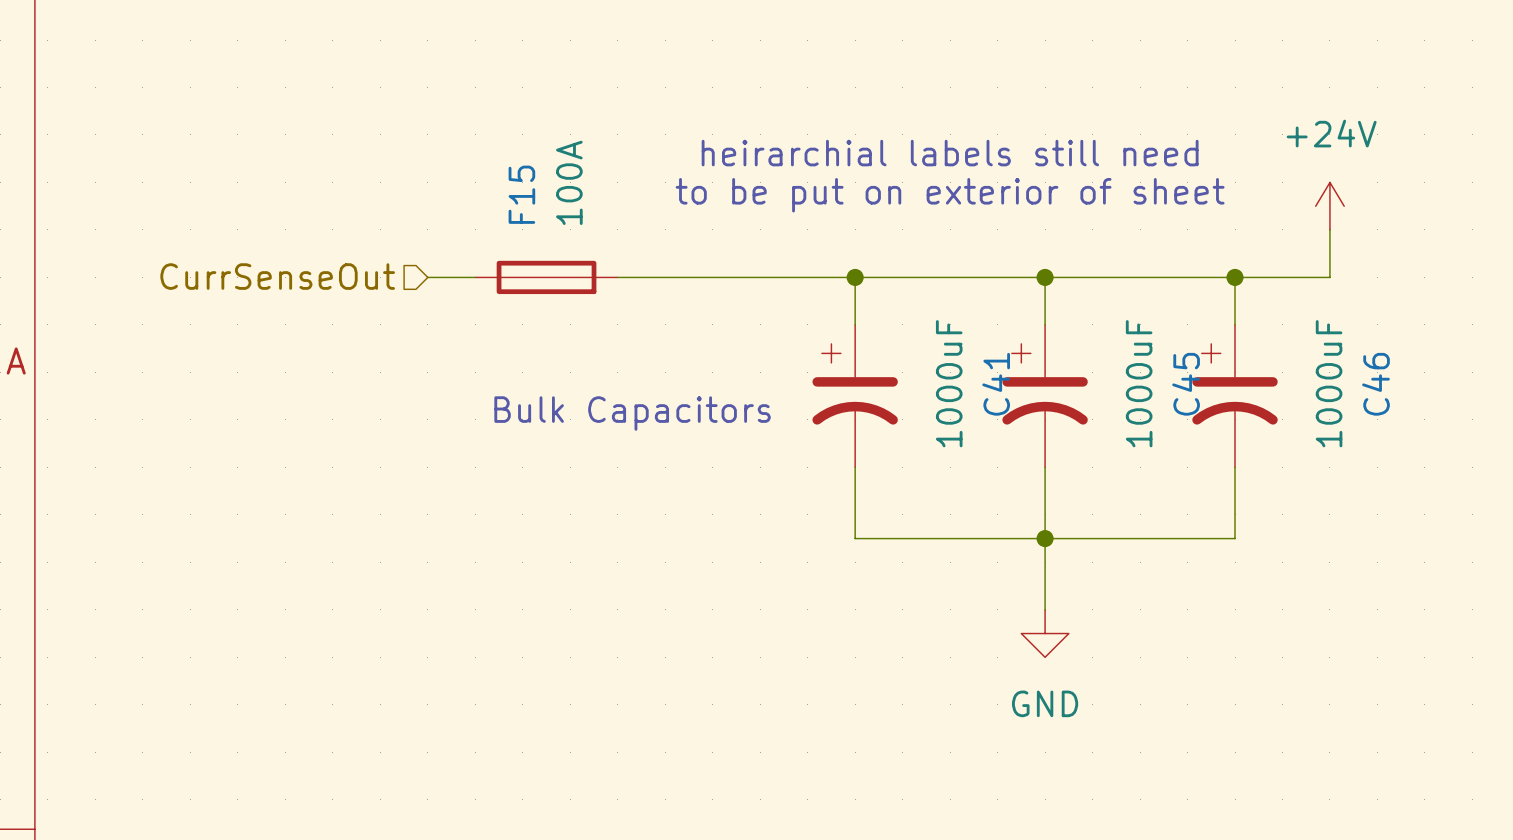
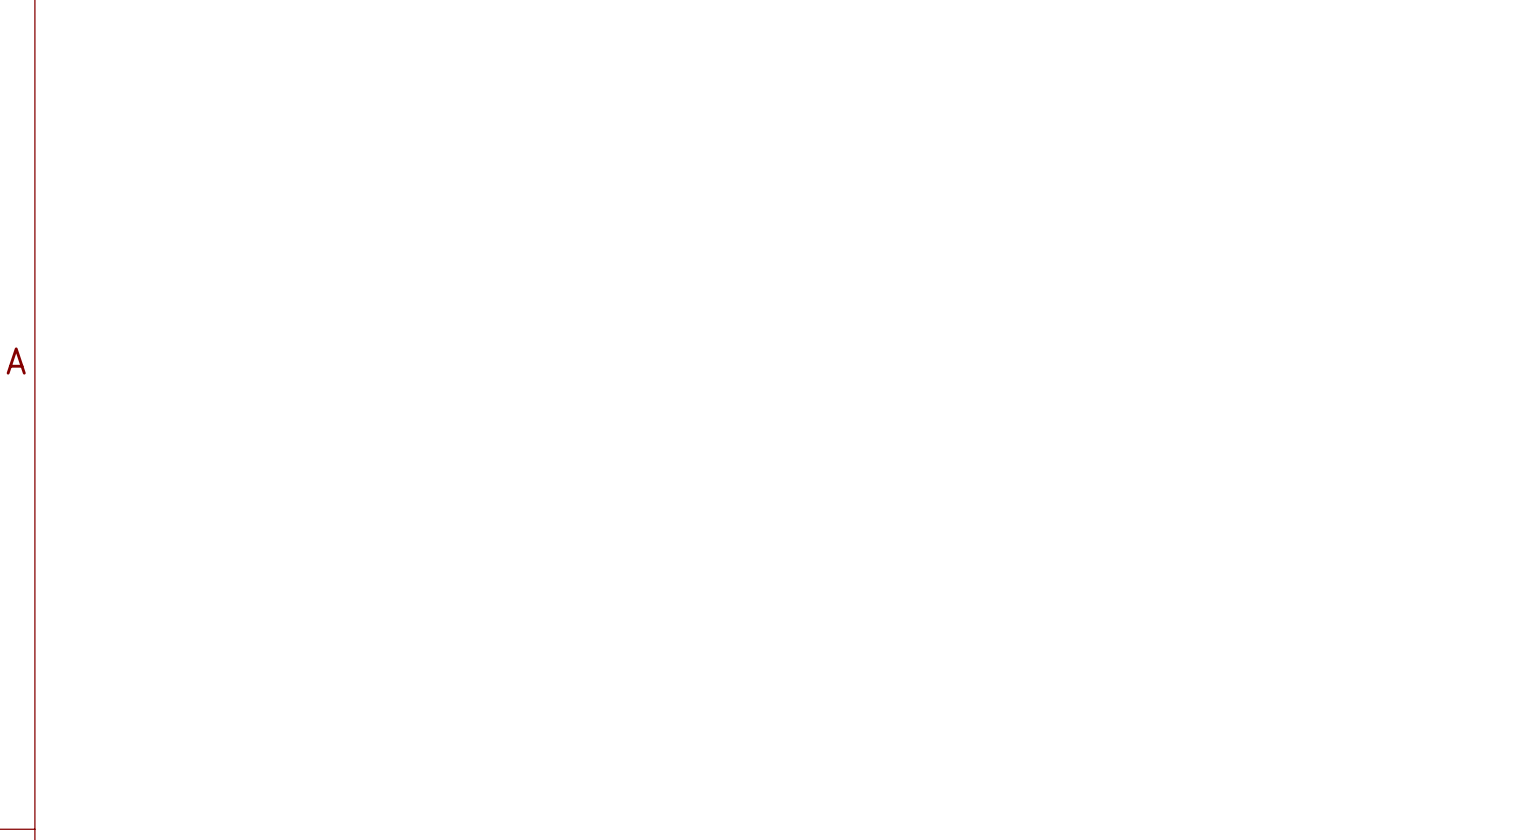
text: heirarchial labels still need (950, 153) -> none
text: to be put on exterior of sheet (950, 195) -> none
power symbol: +24V (1329, 206) -> none
wire: (1329, 229) (1329, 277) (617, 277) -> none
hierarchical label: CurrSenseOut (277, 276) -> none
wire: (427, 277) (475, 277) -> none
F15: 100A (546, 277) -> none
wire: (855, 277) (855, 324) -> none
junction: (855, 277) -> none
wire: (1045, 277) (1045, 324) -> none
junction: (1045, 277) -> none
wire: (1235, 277) (1235, 324) -> none
junction: (1235, 277) -> none
C41: 1000uF (855, 396) -> none
C45: 1000uF (1045, 396) -> none
C46: 1000uF (1235, 396) -> none
text: Bulk Capacitors (632, 413) -> none
wire: (855, 467) (855, 538) (1235, 538) (1235, 467) -> none
wire: (1045, 467) (1045, 609) -> none
junction: (1045, 538) -> none
power symbol: GND (1045, 633) -> none

